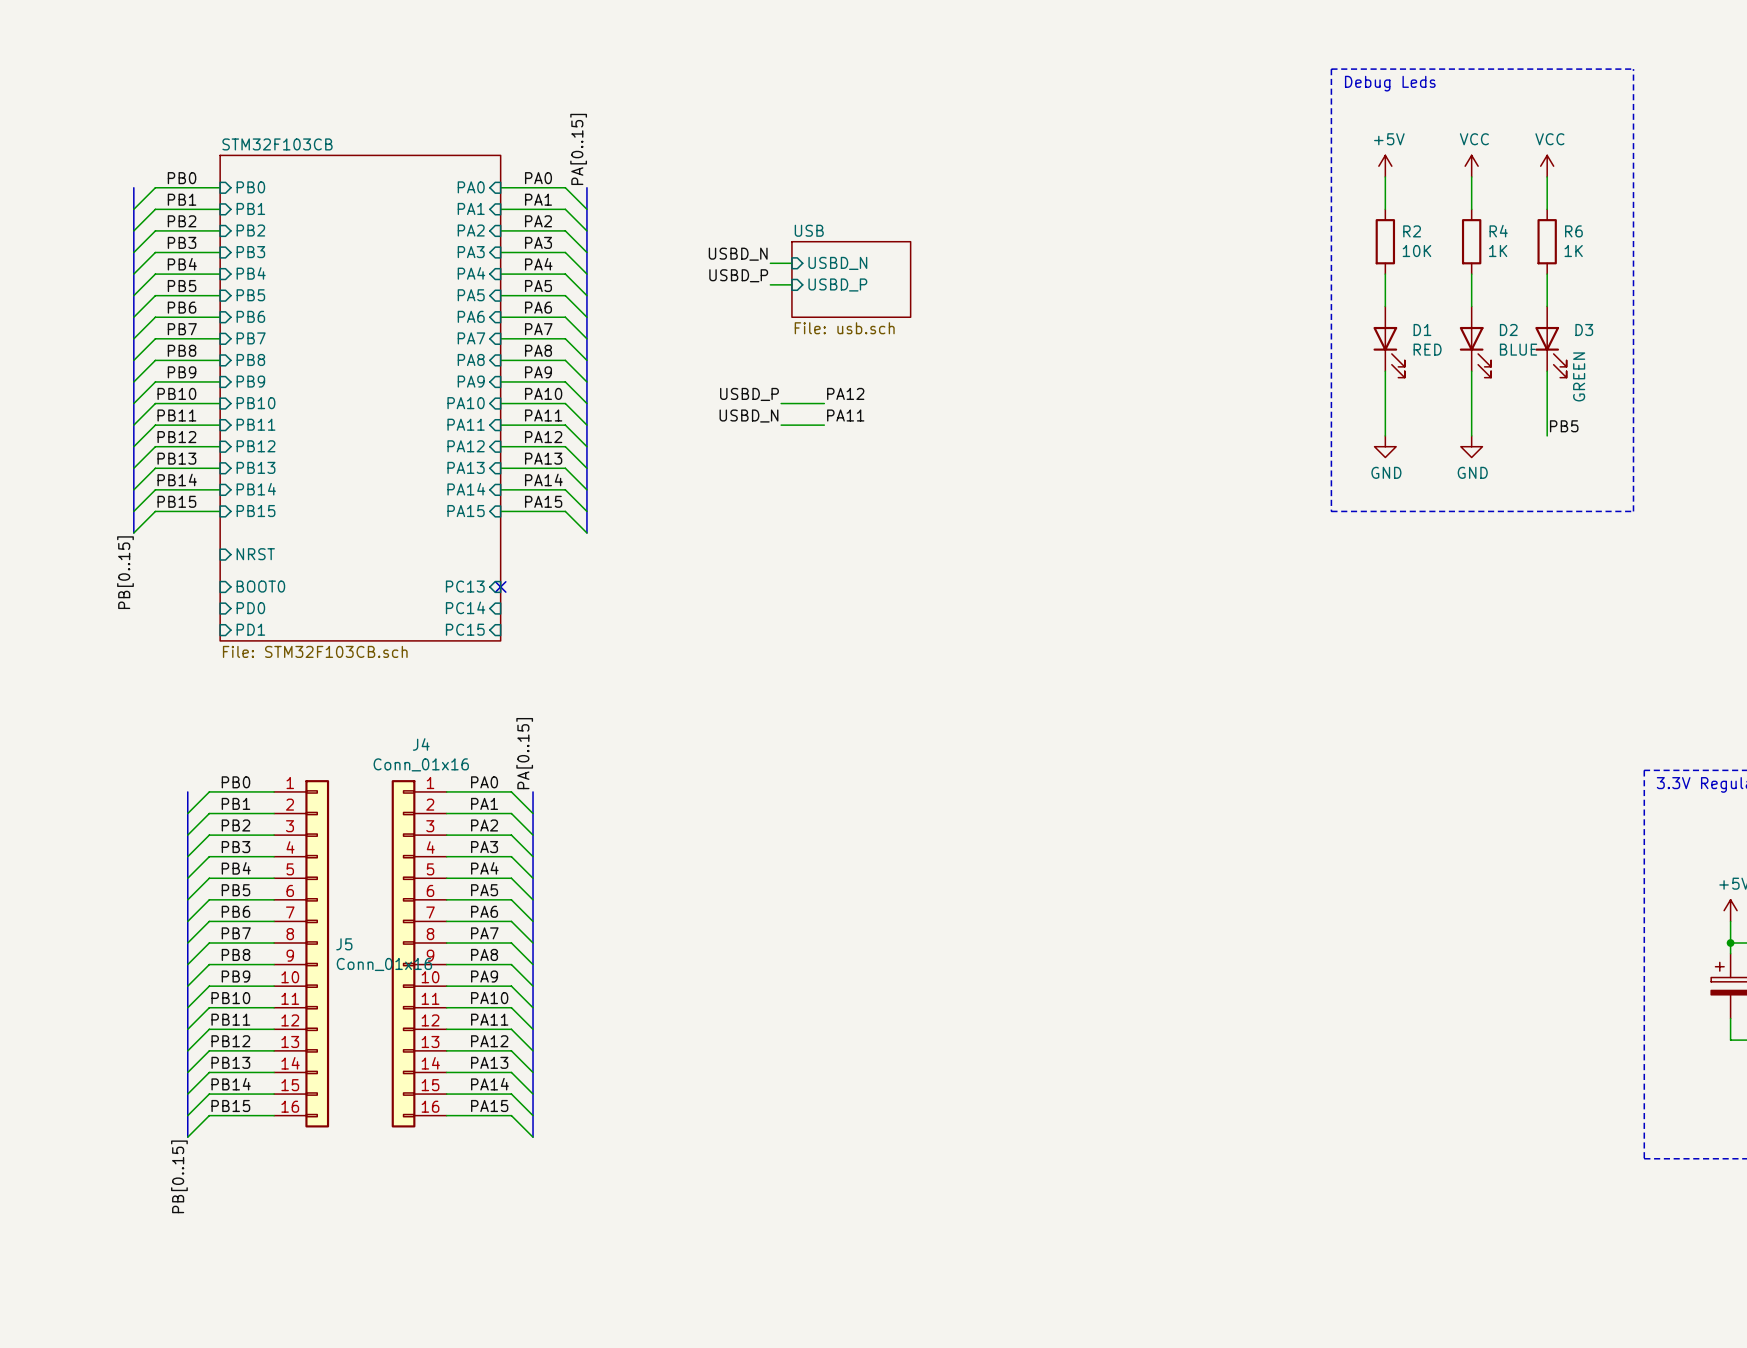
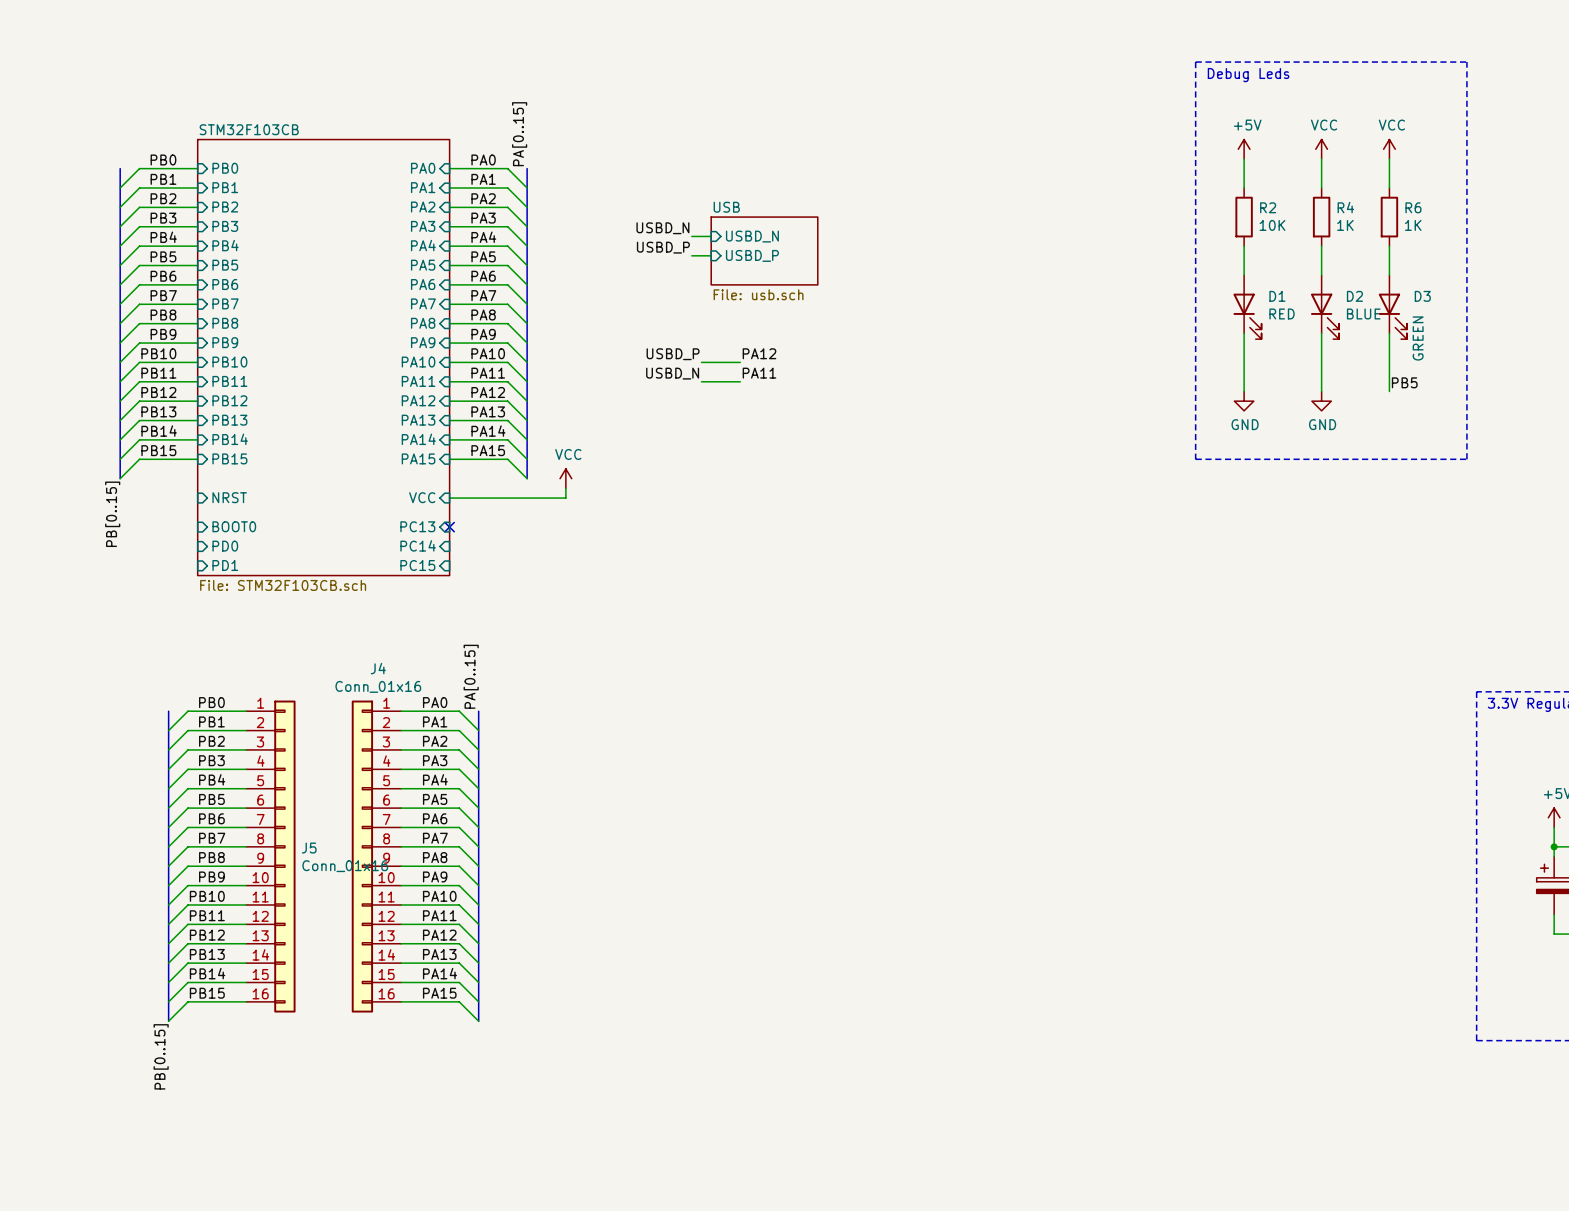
power symbol: none -> VCC (565, 478)
wire: none -> (565, 488) (565, 498) (449, 498)
sheet pin: none -> VCC (422, 497)

